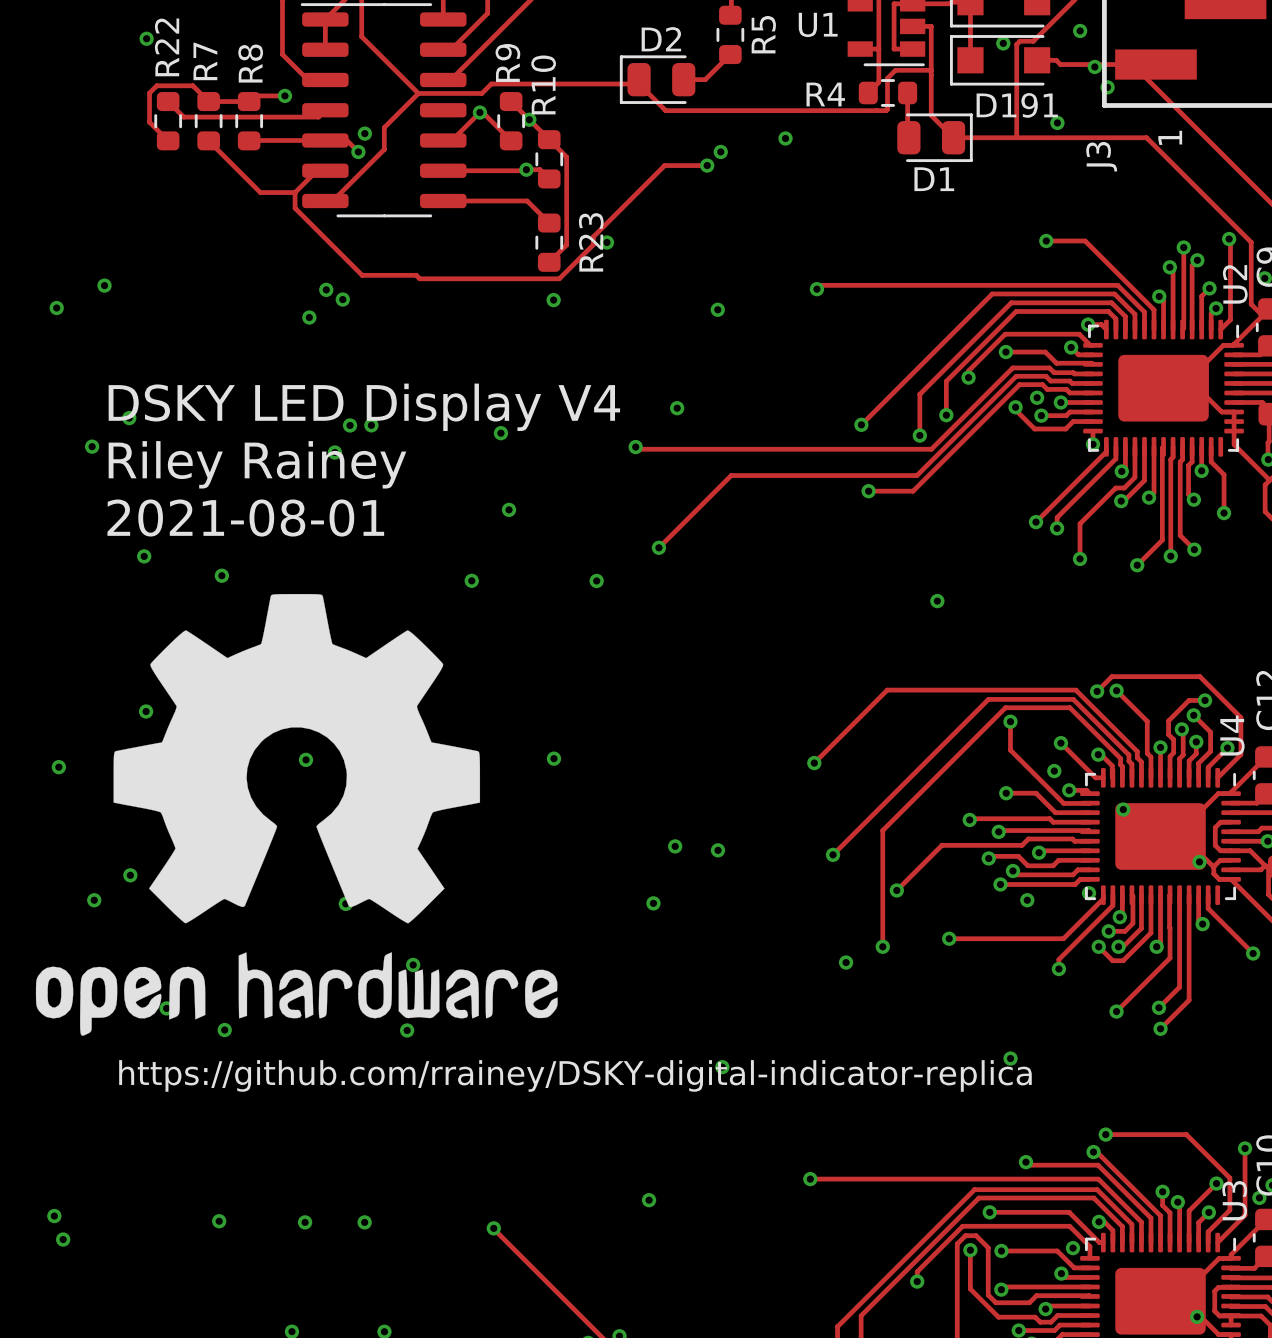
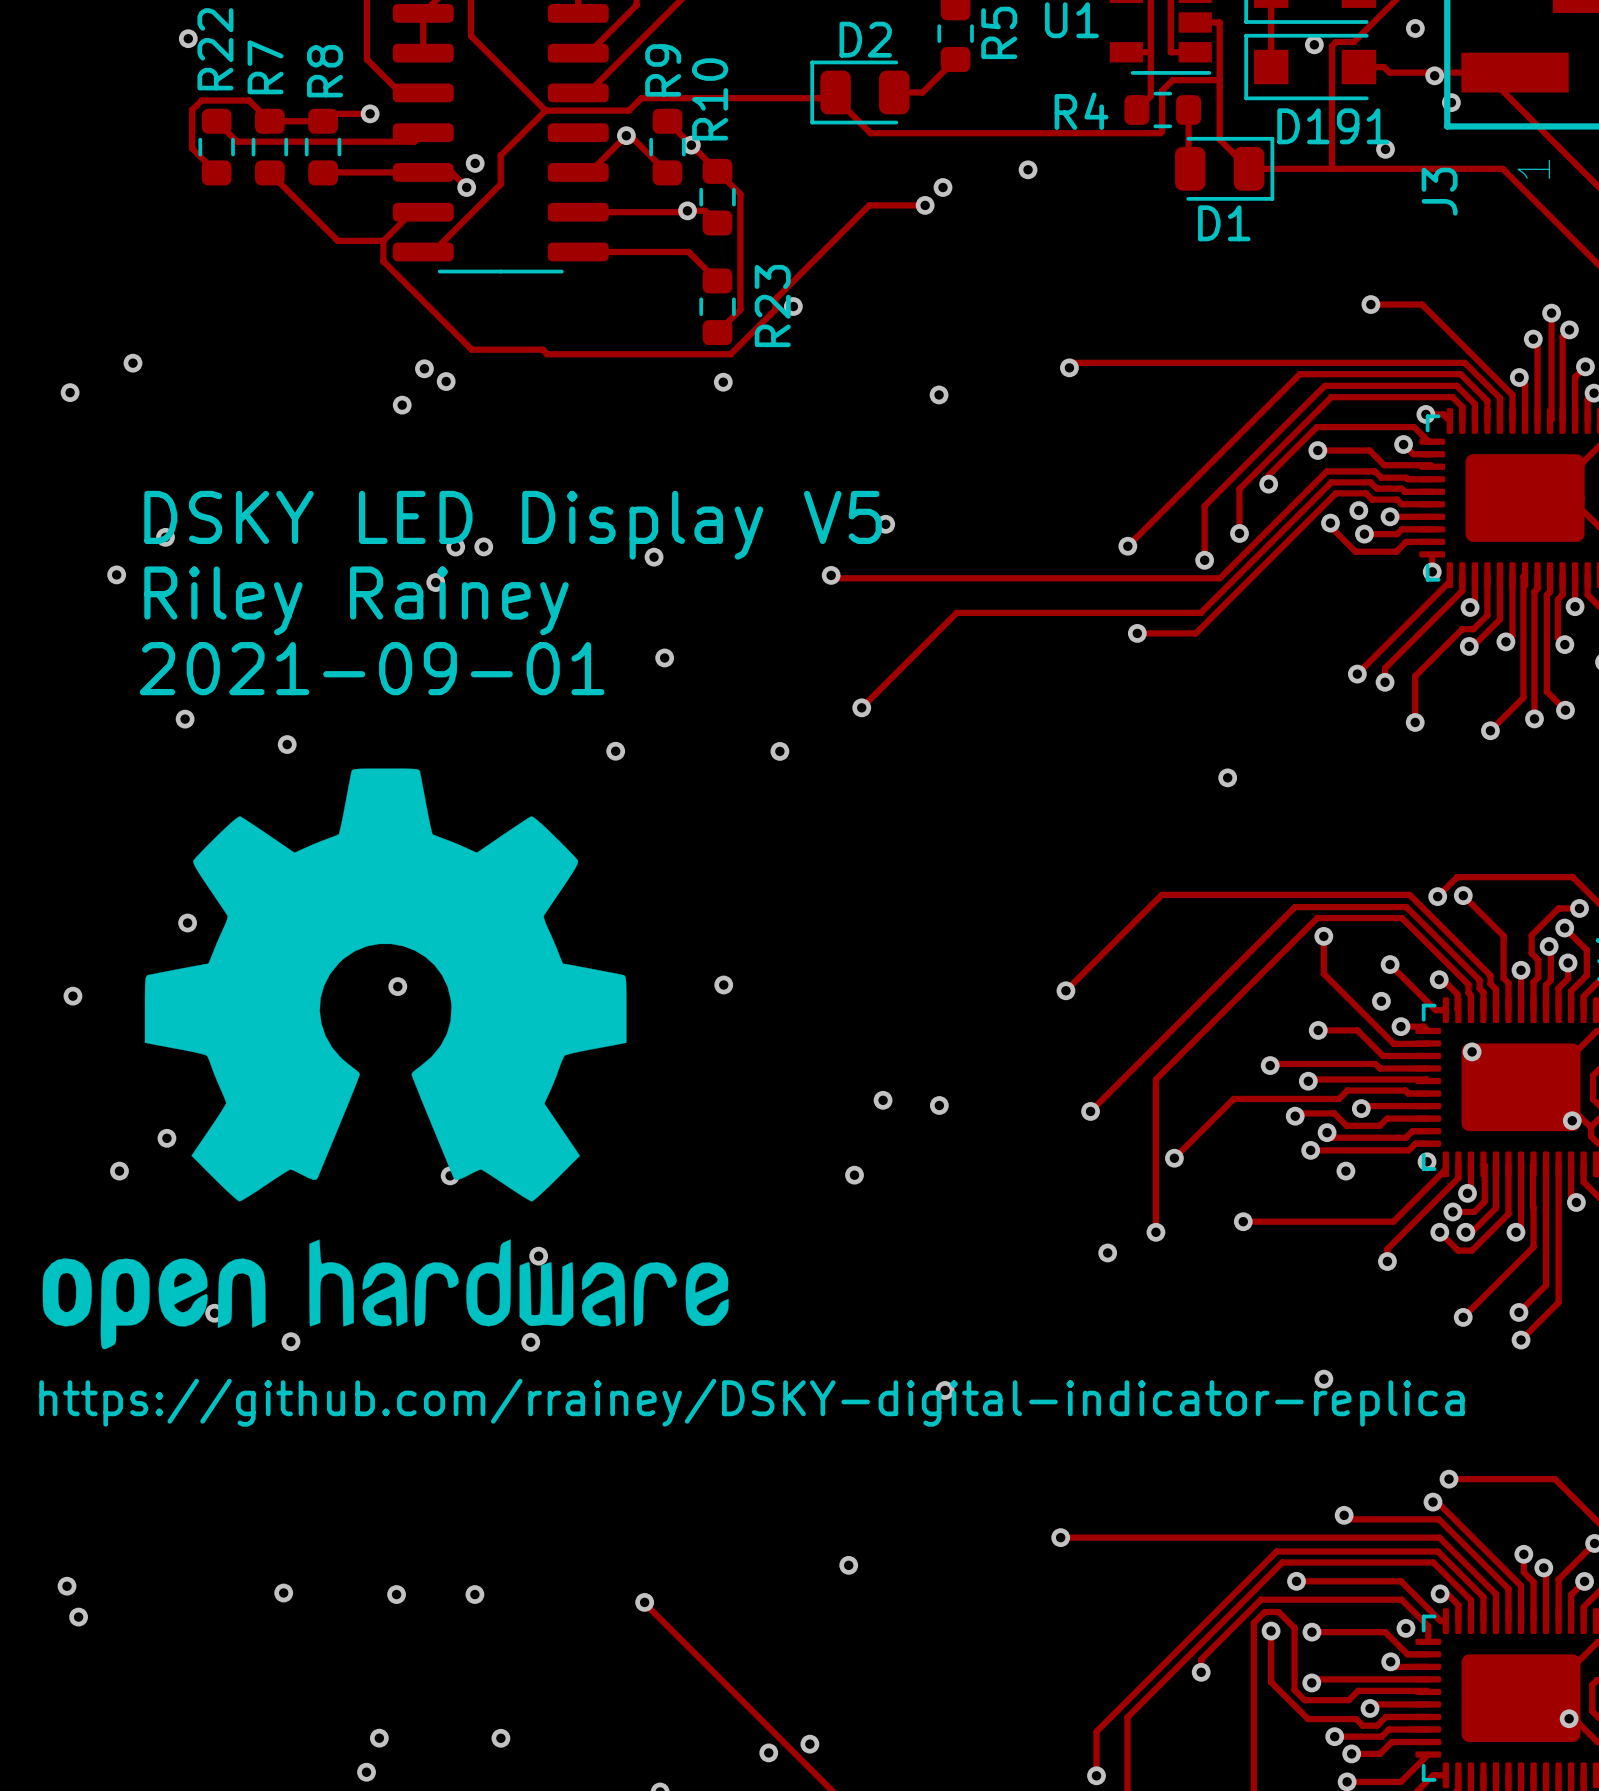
text: DSKY LED Display V4 (364, 407) -> DSKY LED Display V5 (513, 525)
text: 2021-08-01 (245, 518) -> 2021-09-01 (372, 668)

